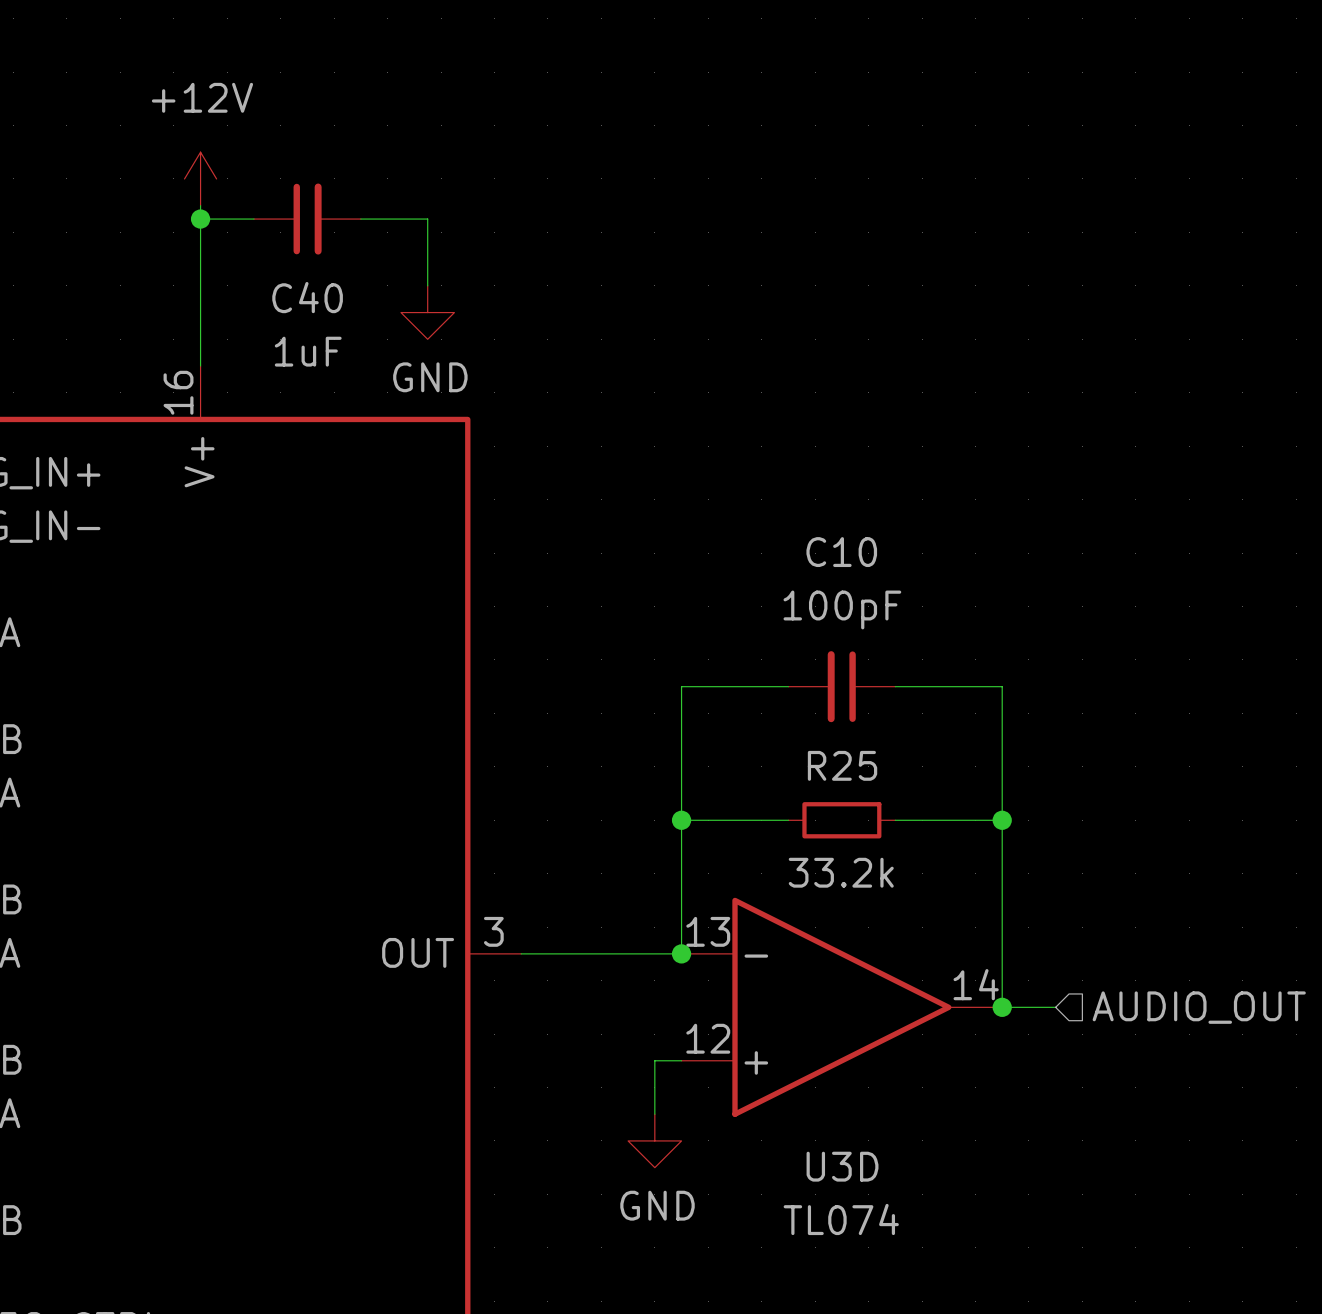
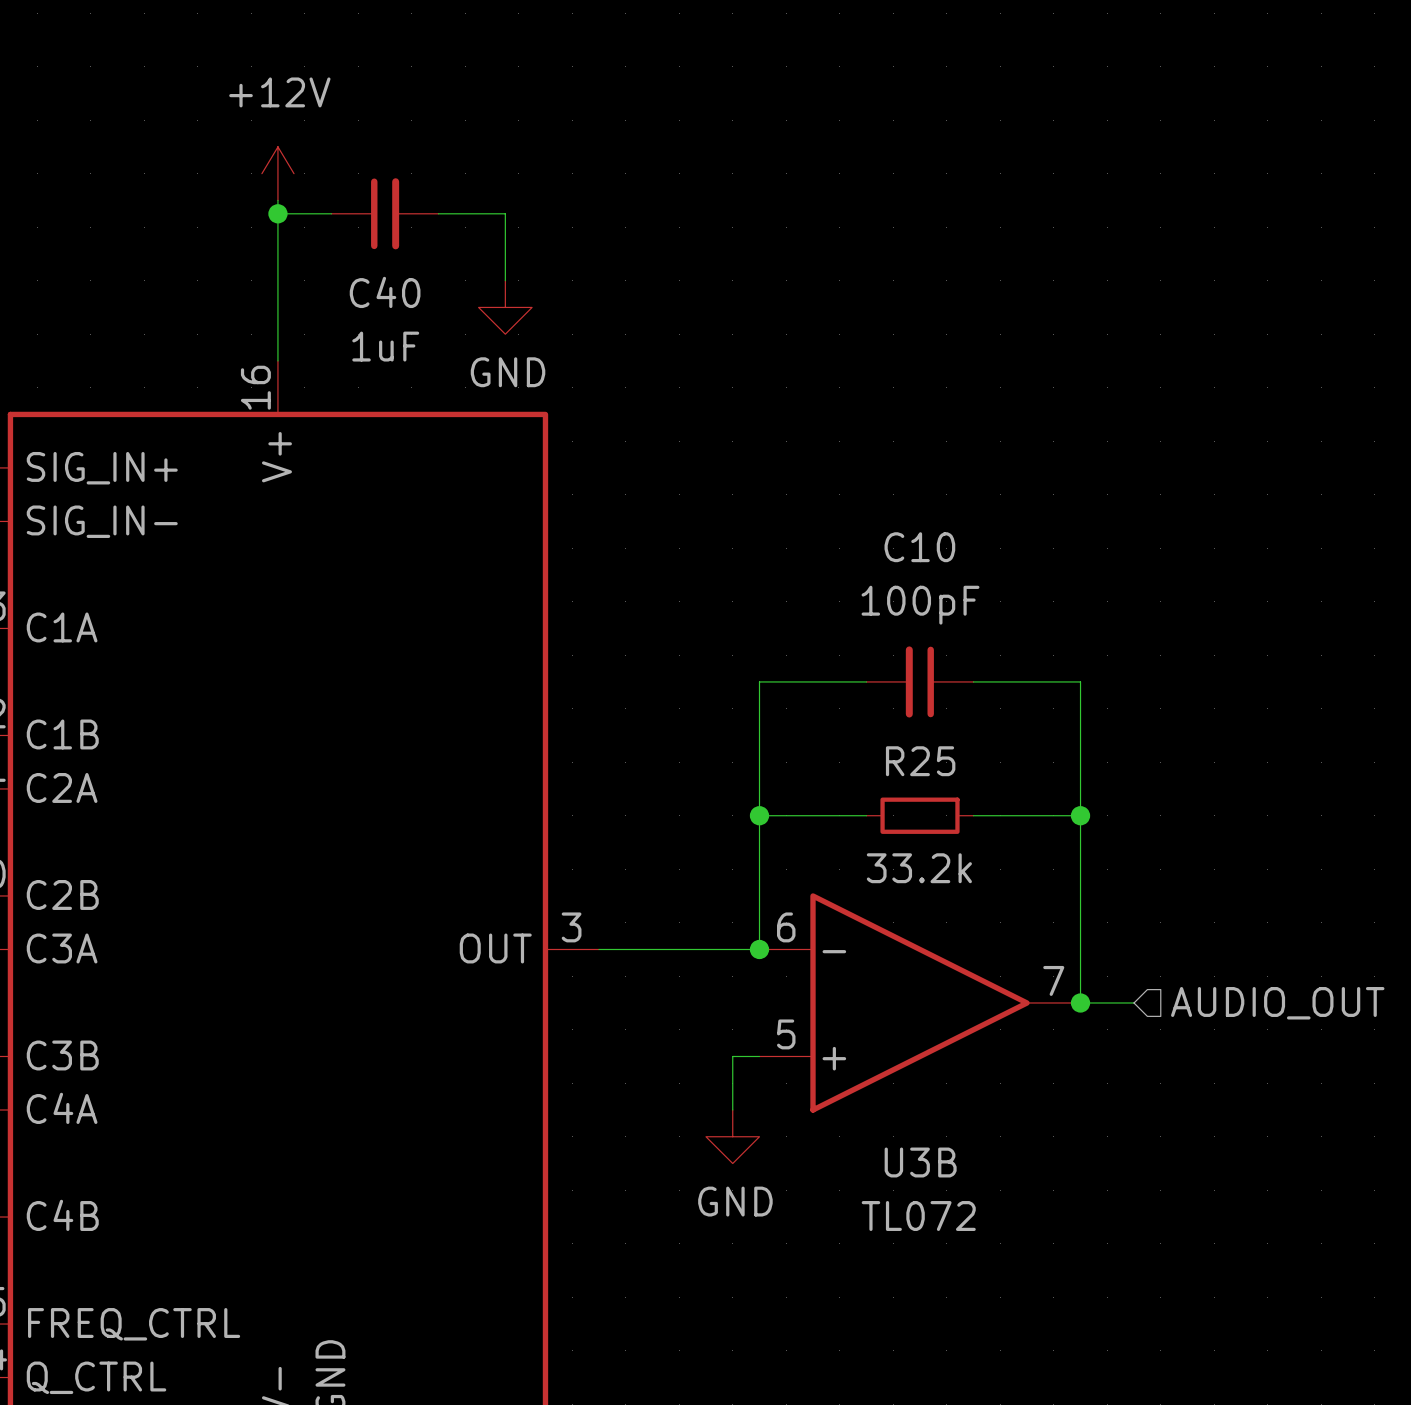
U3D pin number: 13 (708, 931) -> 6 (786, 927)
U3D pin number: 14 (976, 984) -> 7 (1053, 980)
U3D pin number: 12 (708, 1038) -> 5 (786, 1034)
U3D name: U3D (842, 1166) -> U3B (920, 1162)
U3D value: TL074 (841, 1219) -> TL072 (918, 1216)

